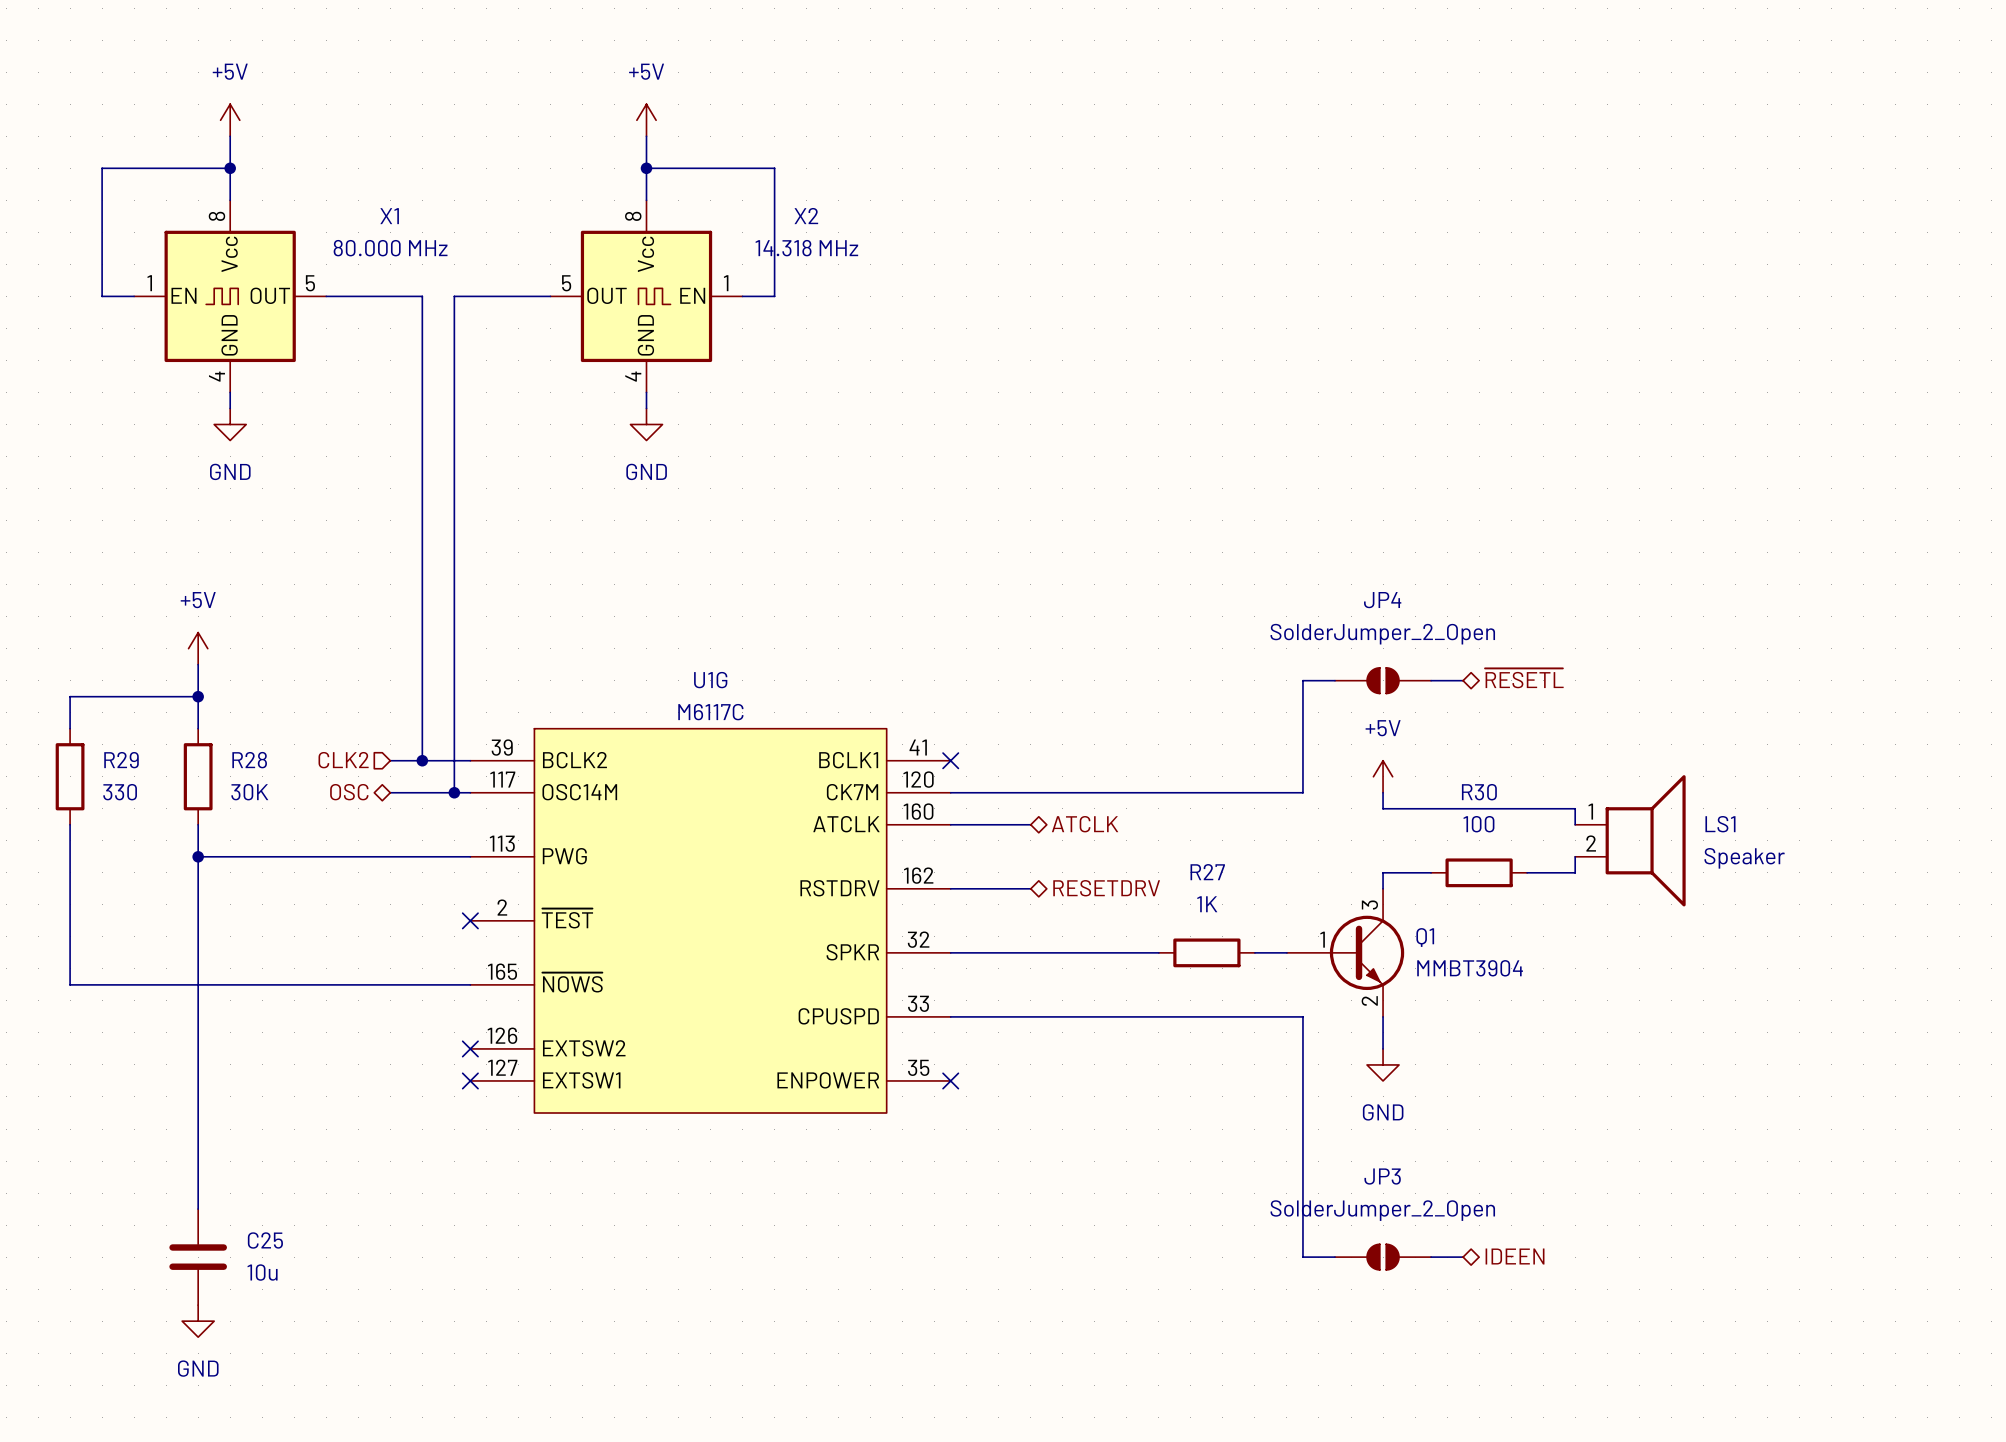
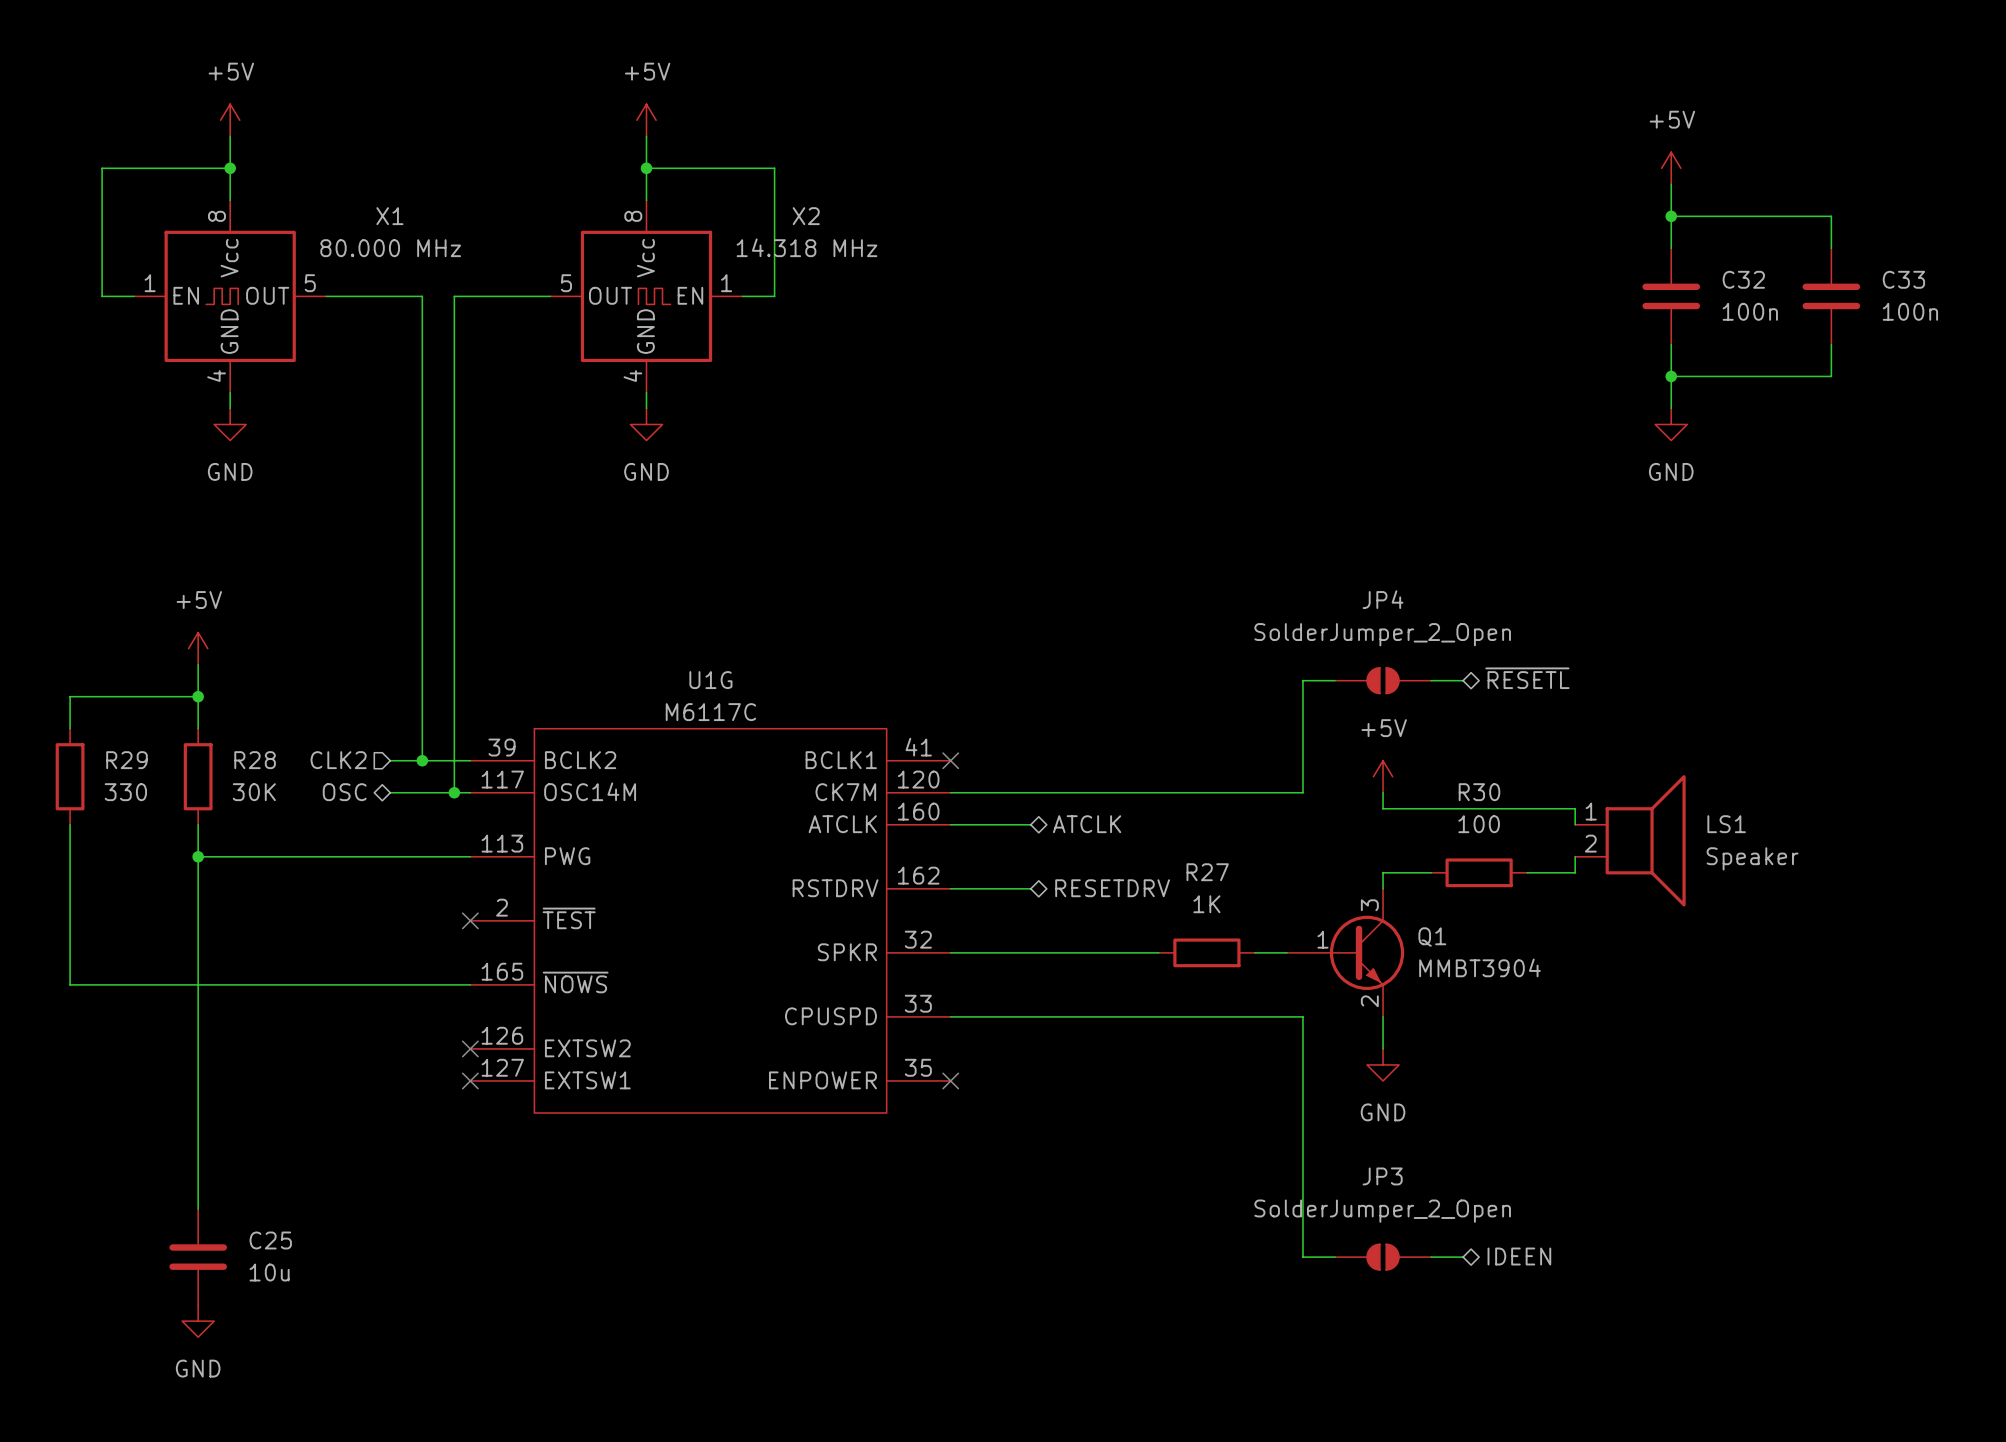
power symbol: none -> +5V (1671, 168)
wire: none -> (1671, 184) (1671, 248)
wire: none -> (1671, 216) (1831, 216) (1831, 248)
junction: none -> (1671, 216)
C32: none -> 100n (1671, 296)
C33: none -> 100n (1831, 296)
wire: none -> (1671, 344) (1671, 408)
wire: none -> (1831, 344) (1831, 376) (1671, 376)
junction: none -> (1671, 376)
power symbol: none -> GND (1671, 424)

